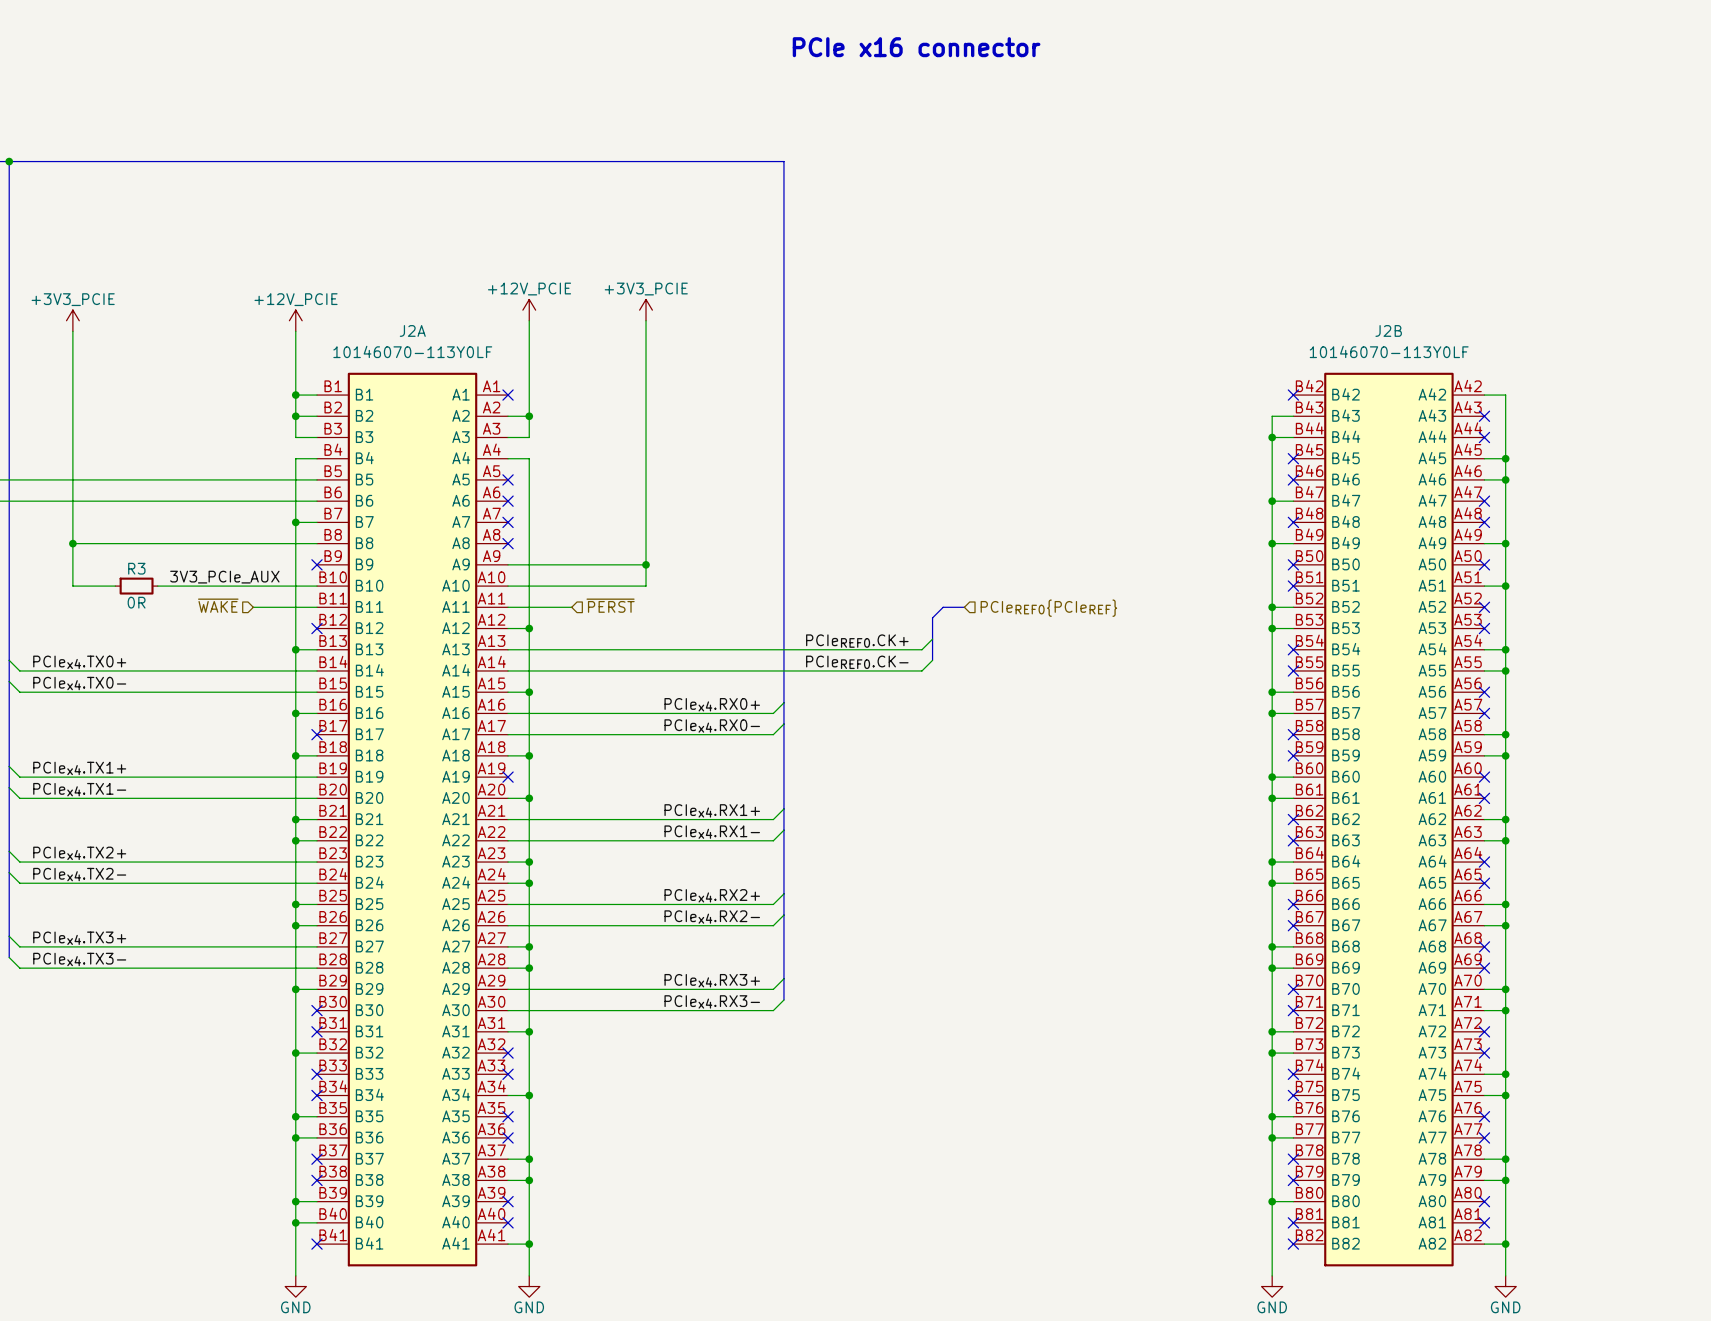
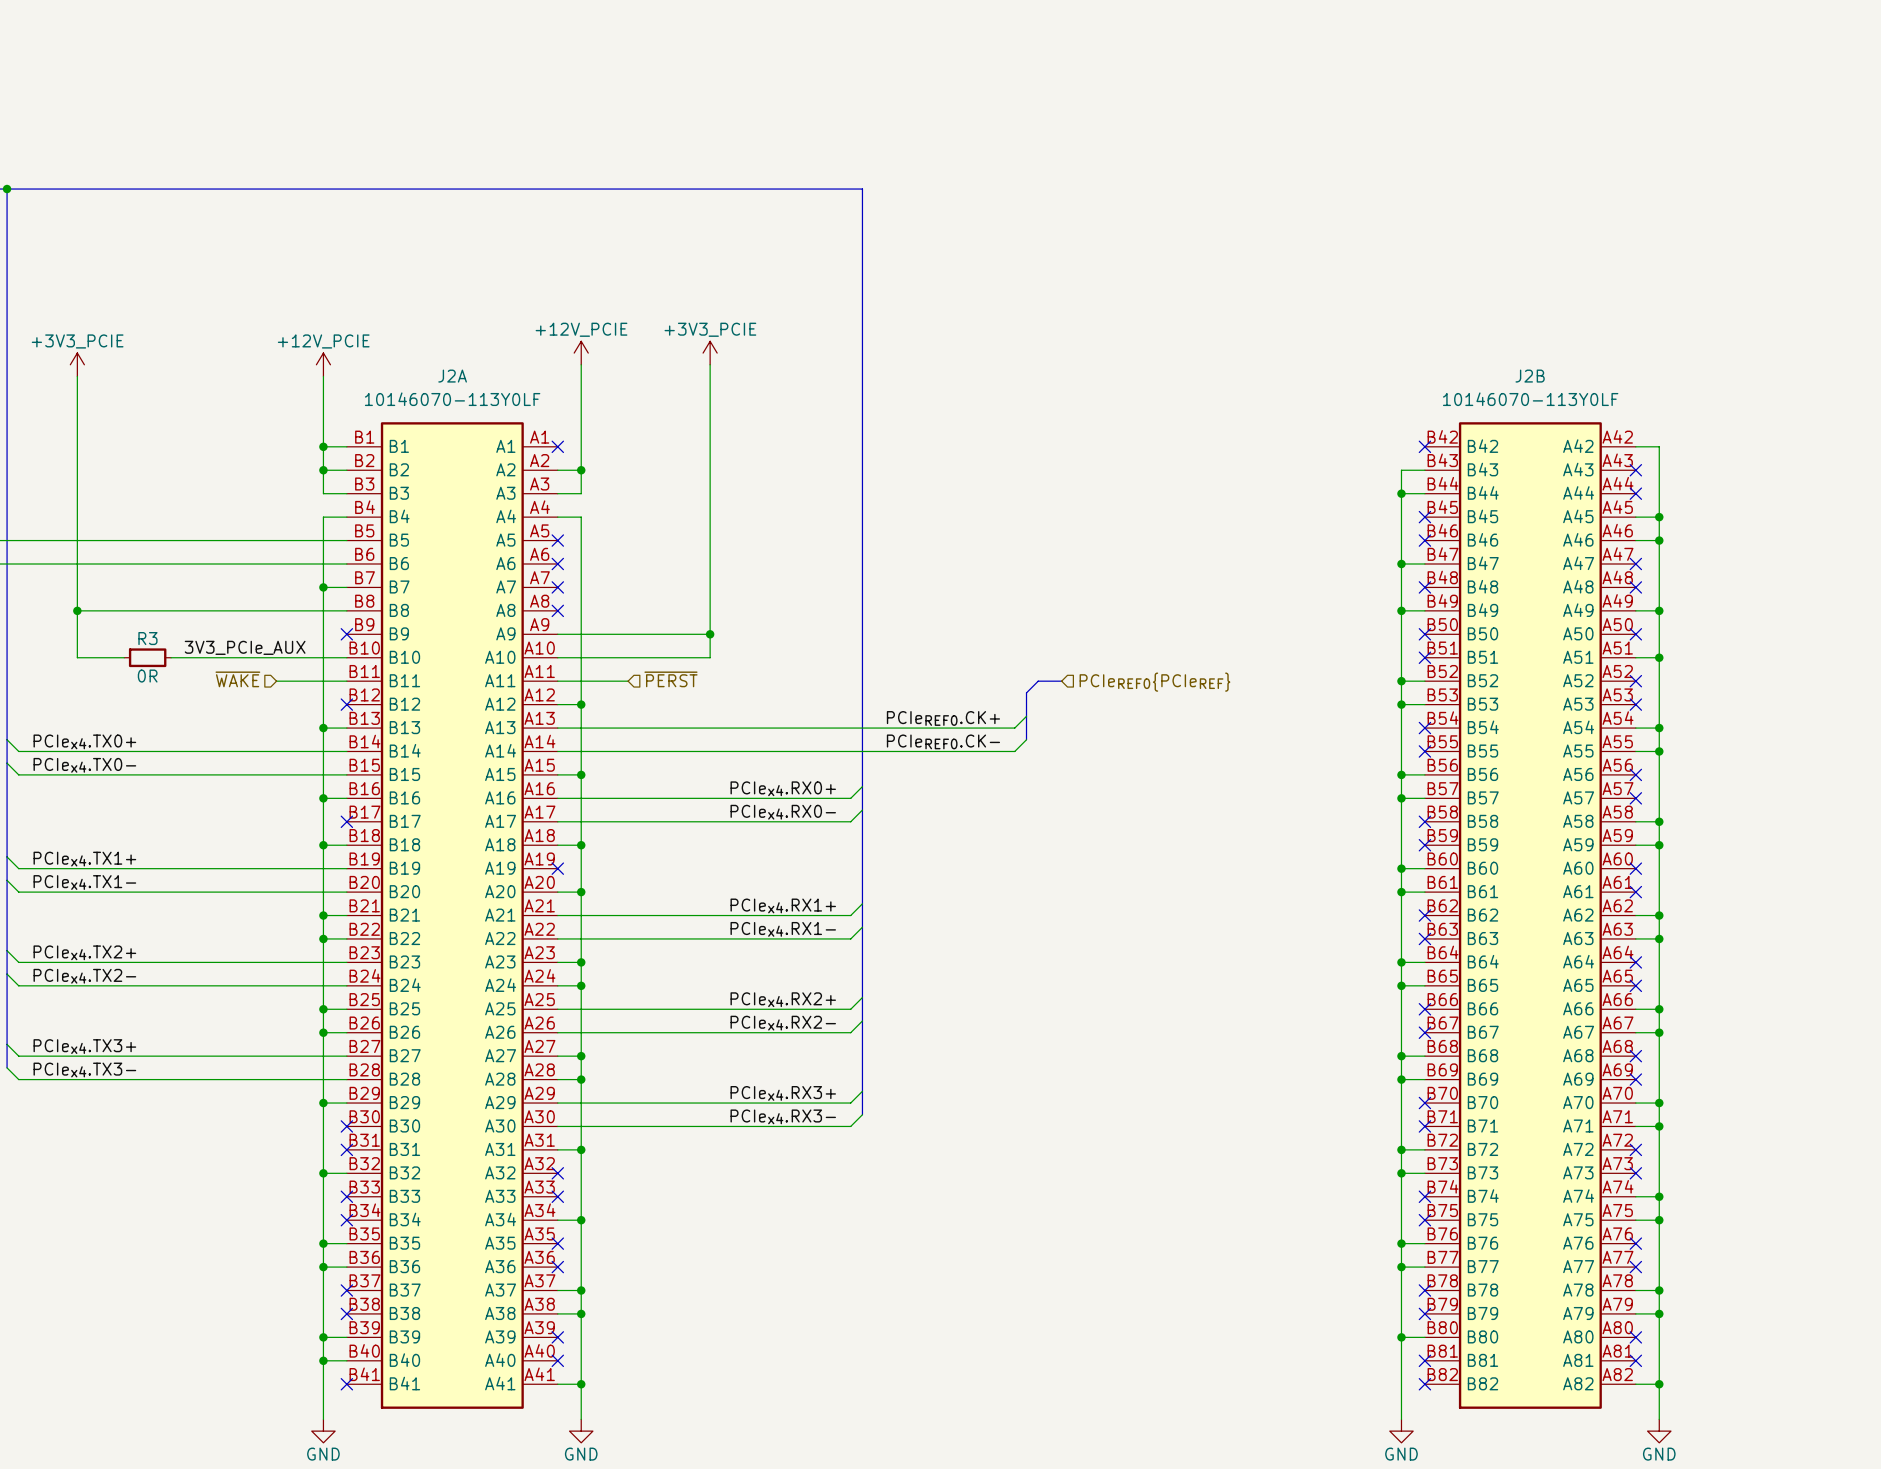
text: PCIe x16 connector (916, 47) -> none

